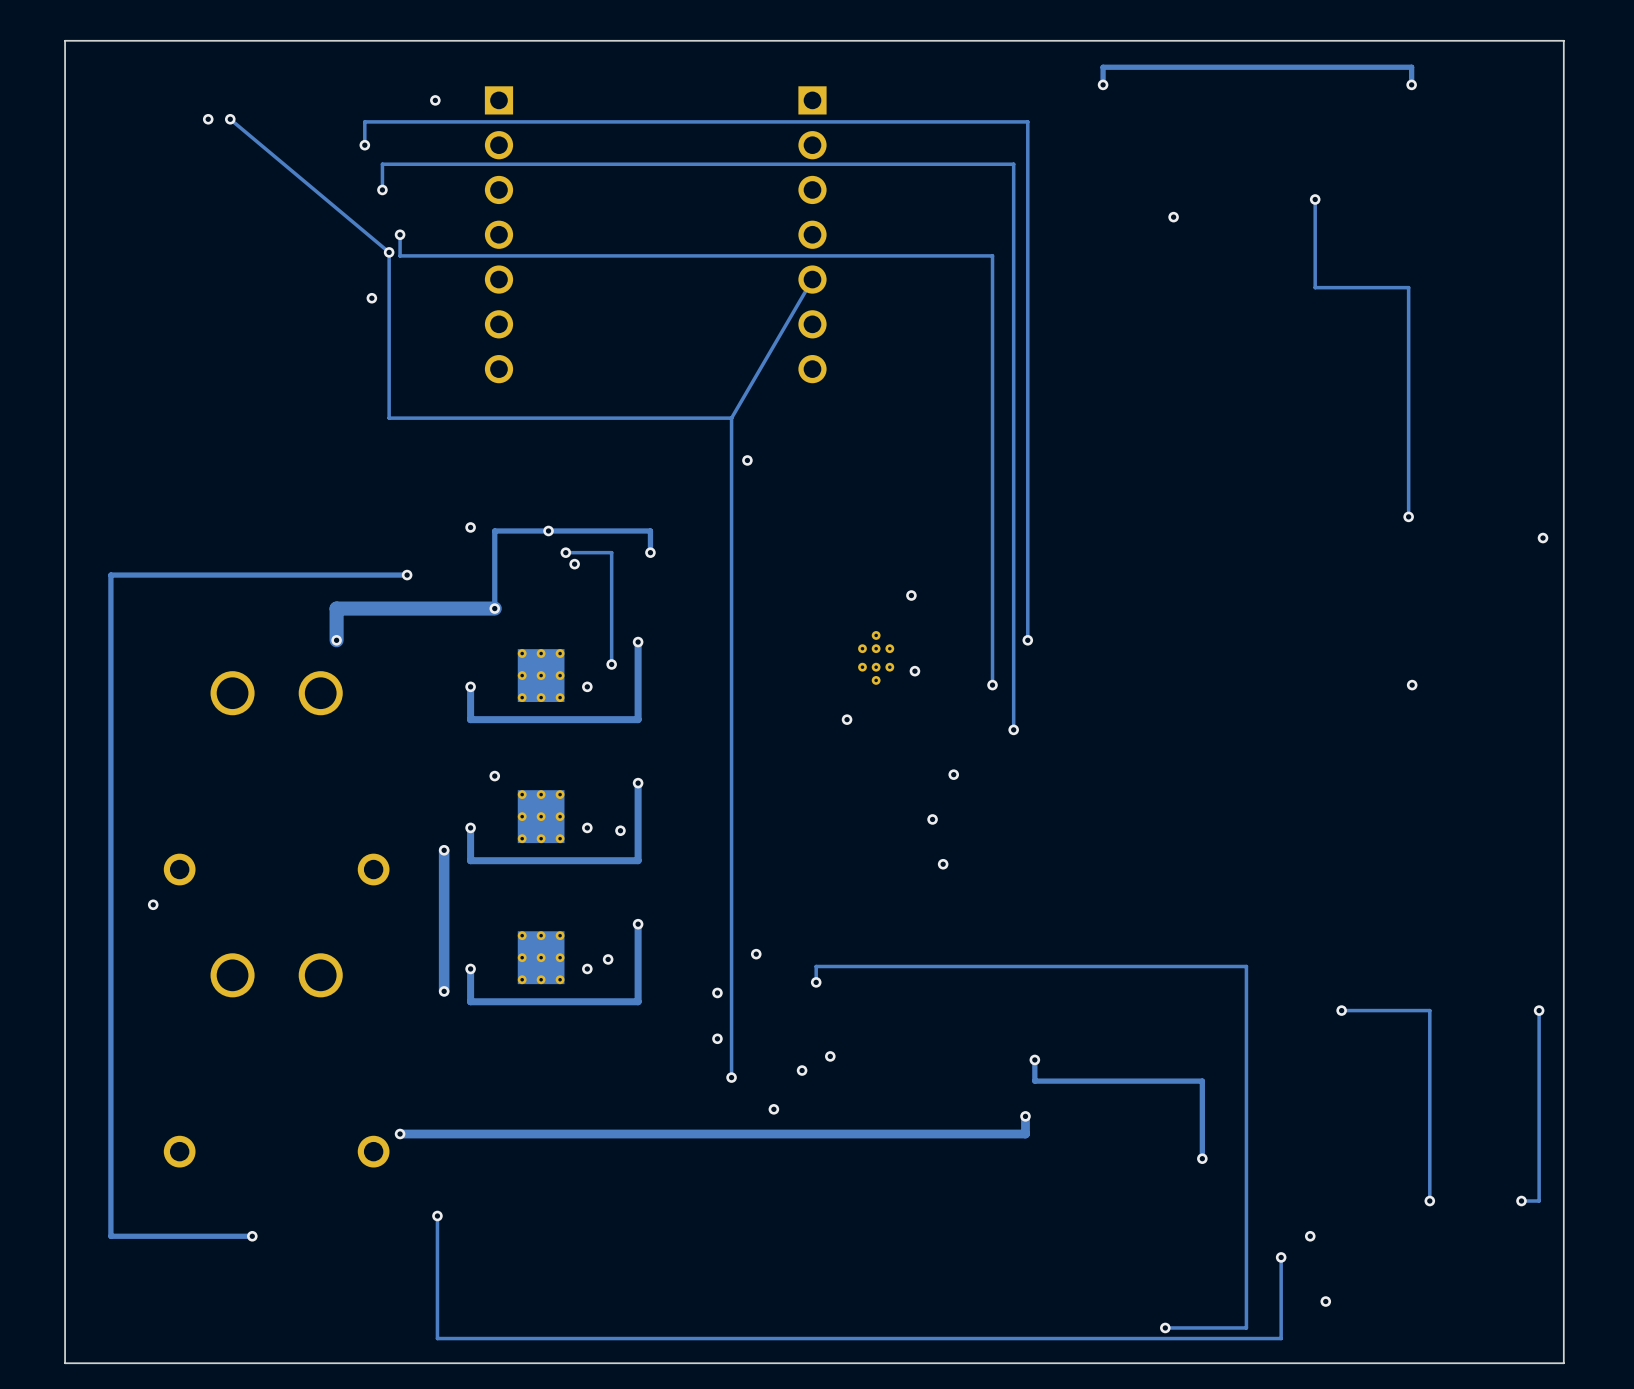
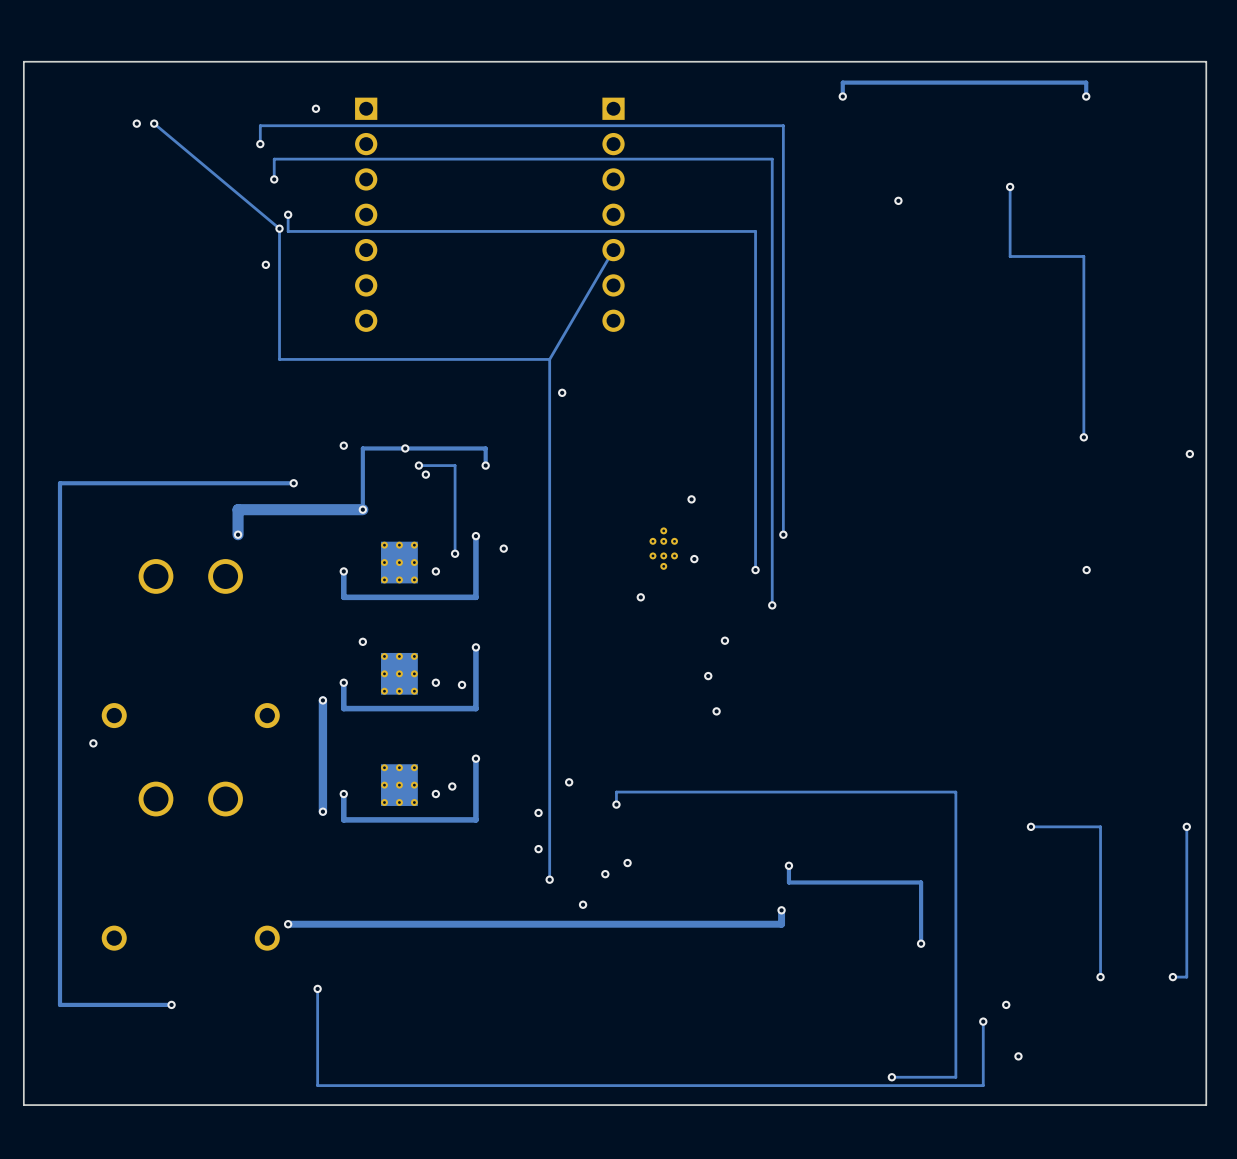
via: none -> (503, 548)

